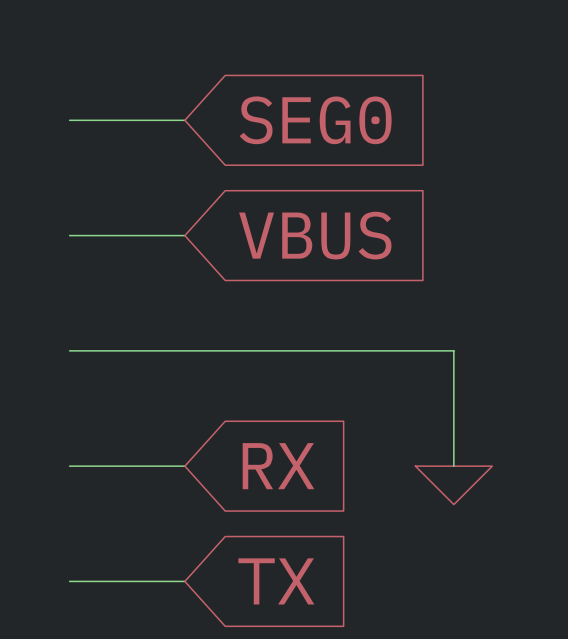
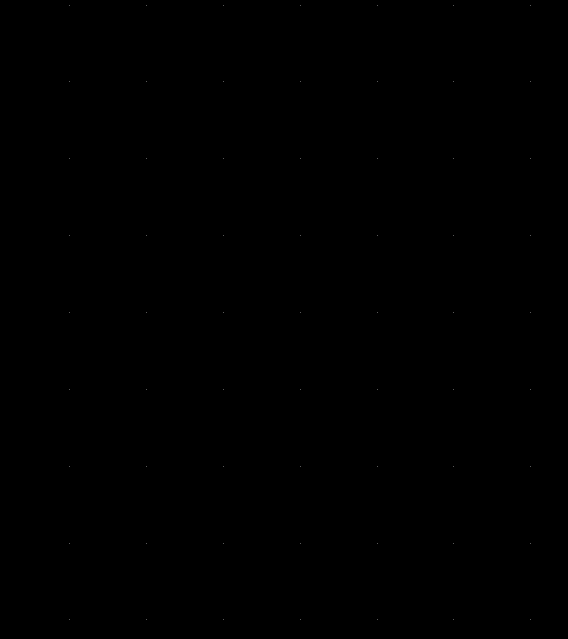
wire: (69, 120) (184, 120) -> none
global label: SEG0 (315, 120) -> none
wire: (69, 235) (184, 235) -> none
global label: VBUS (315, 235) -> none
wire: (69, 350) (453, 350) (453, 466) -> none
wire: (69, 466) (184, 466) -> none
global label: RX (278, 466) -> none
power symbol: (453, 485) -> none
wire: (69, 581) (184, 581) -> none
global label: TX (276, 581) -> none

